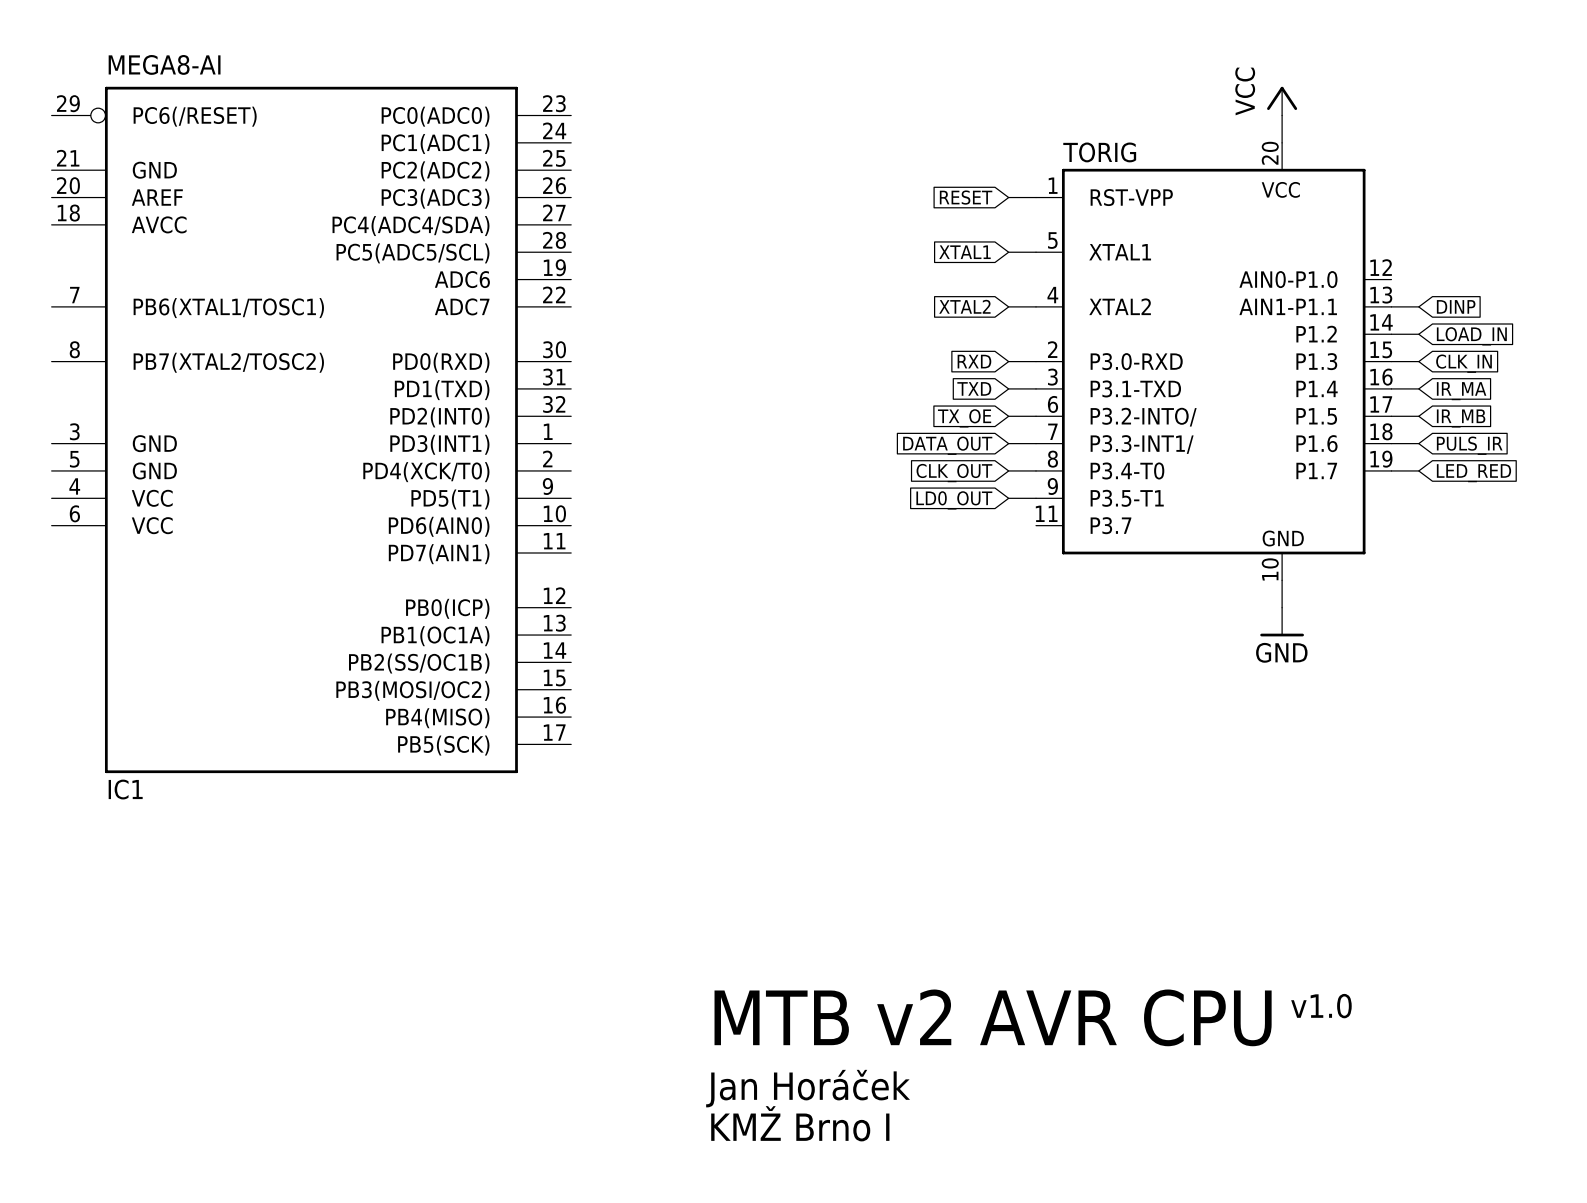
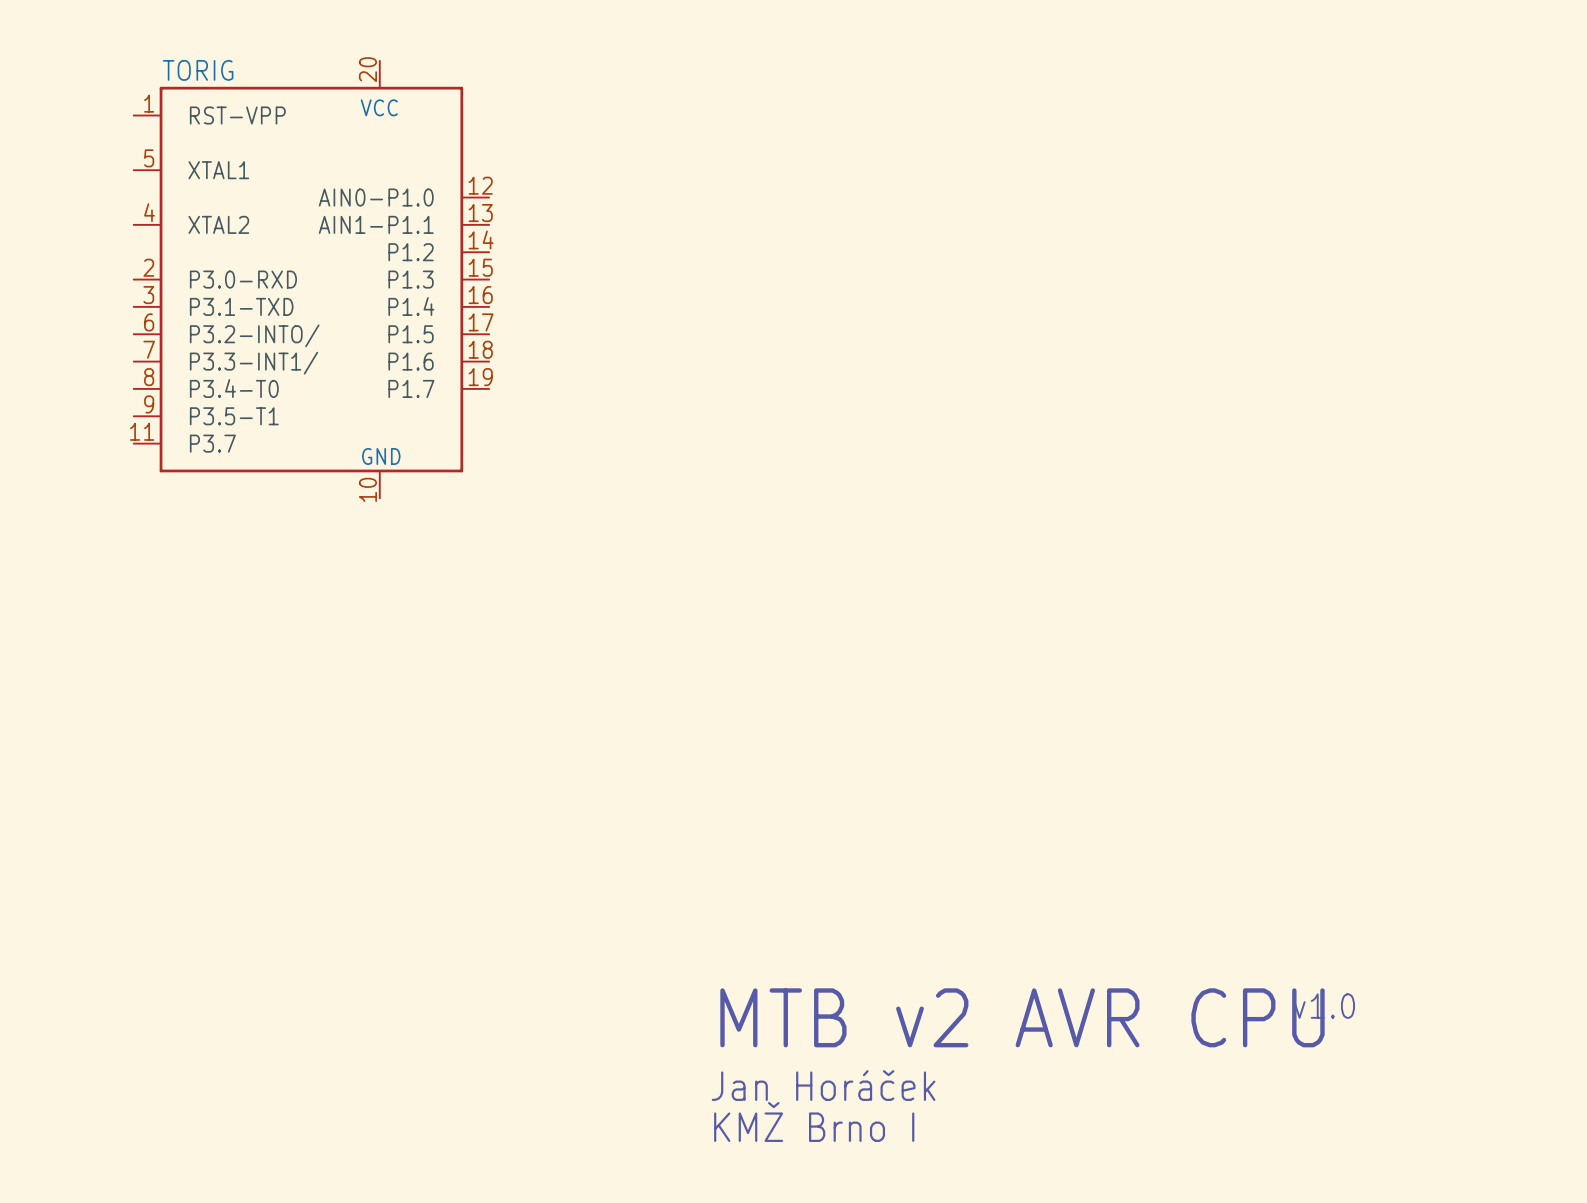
power symbol: VCC (1282, 101) -> none
wire: (1282, 115) (1282, 142) -> none
global label: RESET (966, 197) -> none
wire: (1008, 197) (1036, 197) -> none
global label: XTAL1 (964, 252) -> none
wire: (1008, 252) (1036, 252) -> none
TORIG: none -> (311, 279)
global label: XTAL2 (964, 306) -> none
wire: (1008, 306) (1036, 306) -> none
wire: (1391, 306) (1418, 306) -> none
global label: DINP (1456, 306) -> none
wire: (1391, 334) (1418, 334) -> none
global label: LOAD_IN (1471, 336) -> none
global label: RXD (974, 361) -> none
wire: (1008, 361) (1036, 361) -> none
TORIG: (1213, 361) -> none
wire: (1391, 361) (1418, 361) -> none
global label: CLK_IN (1464, 363) -> none
global label: TXD (974, 388) -> none
wire: (1008, 388) (1036, 388) -> none
wire: (1391, 388) (1418, 388) -> none
global label: IR_MA (1461, 391) -> none
wire: (1008, 416) (1036, 416) -> none
wire: (1391, 416) (1418, 416) -> none
global label: TX_OE (964, 418) -> none
global label: IR_MB (1461, 418) -> none
IC1: MEGA8-AI (311, 429) -> none
wire: (1008, 443) (1036, 443) -> none
wire: (1391, 443) (1418, 443) -> none
global label: DATA_OUT (947, 445) -> none
global label: PULS_IR (1469, 445) -> none
wire: (1008, 470) (1036, 470) -> none
wire: (1391, 470) (1418, 470) -> none
global label: CLK_OUT (954, 473) -> none
global label: LED_RED (1473, 473) -> none
wire: (1008, 498) (1036, 498) -> none
global label: LD0_OUT (954, 500) -> none
wire: (1282, 580) (1282, 607) -> none
power symbol: GND (1282, 622) -> none

